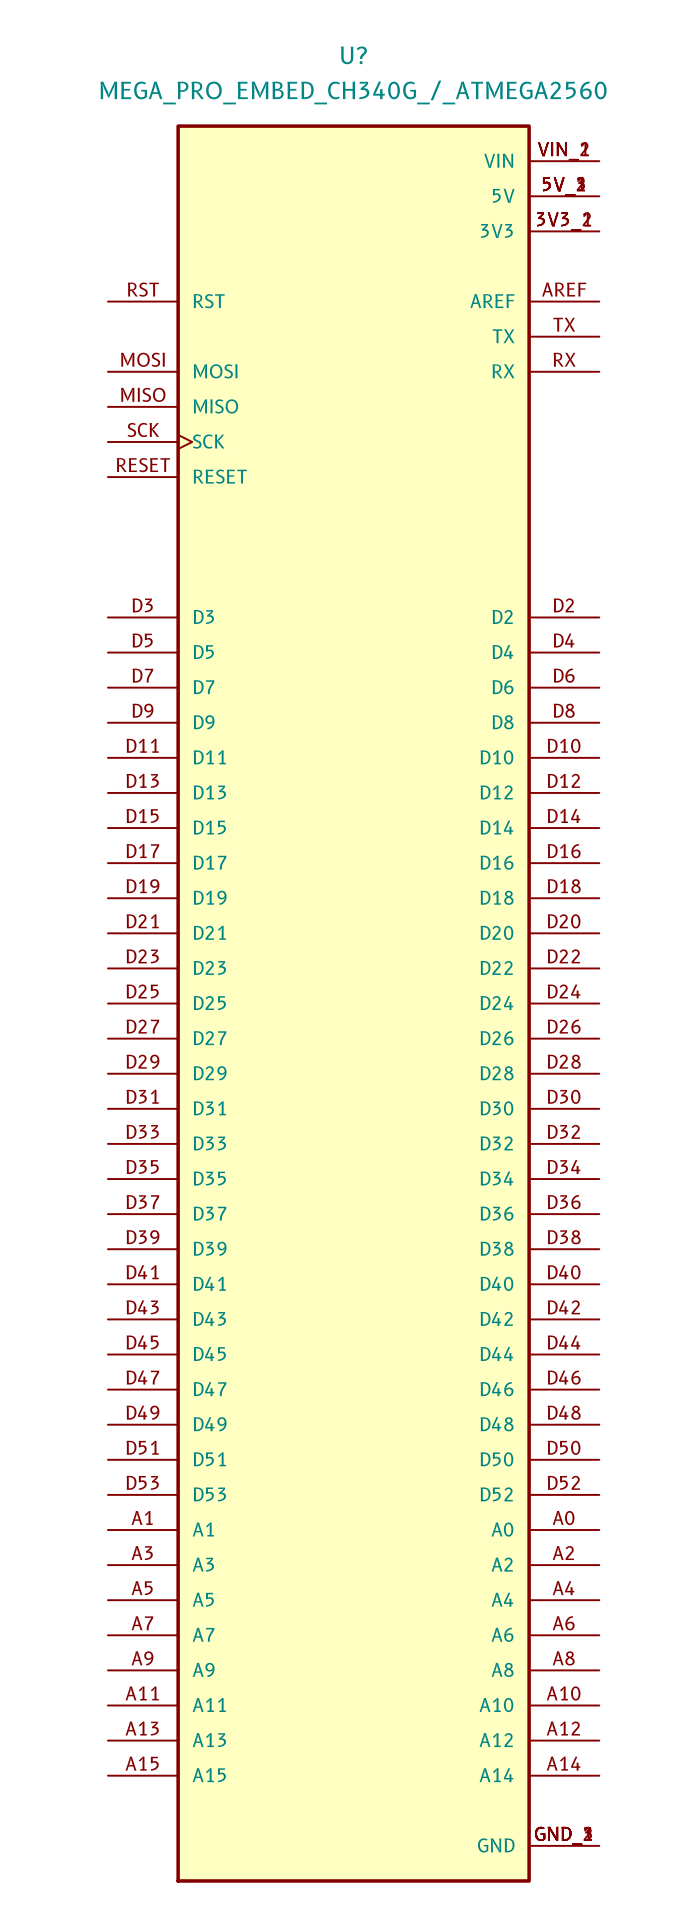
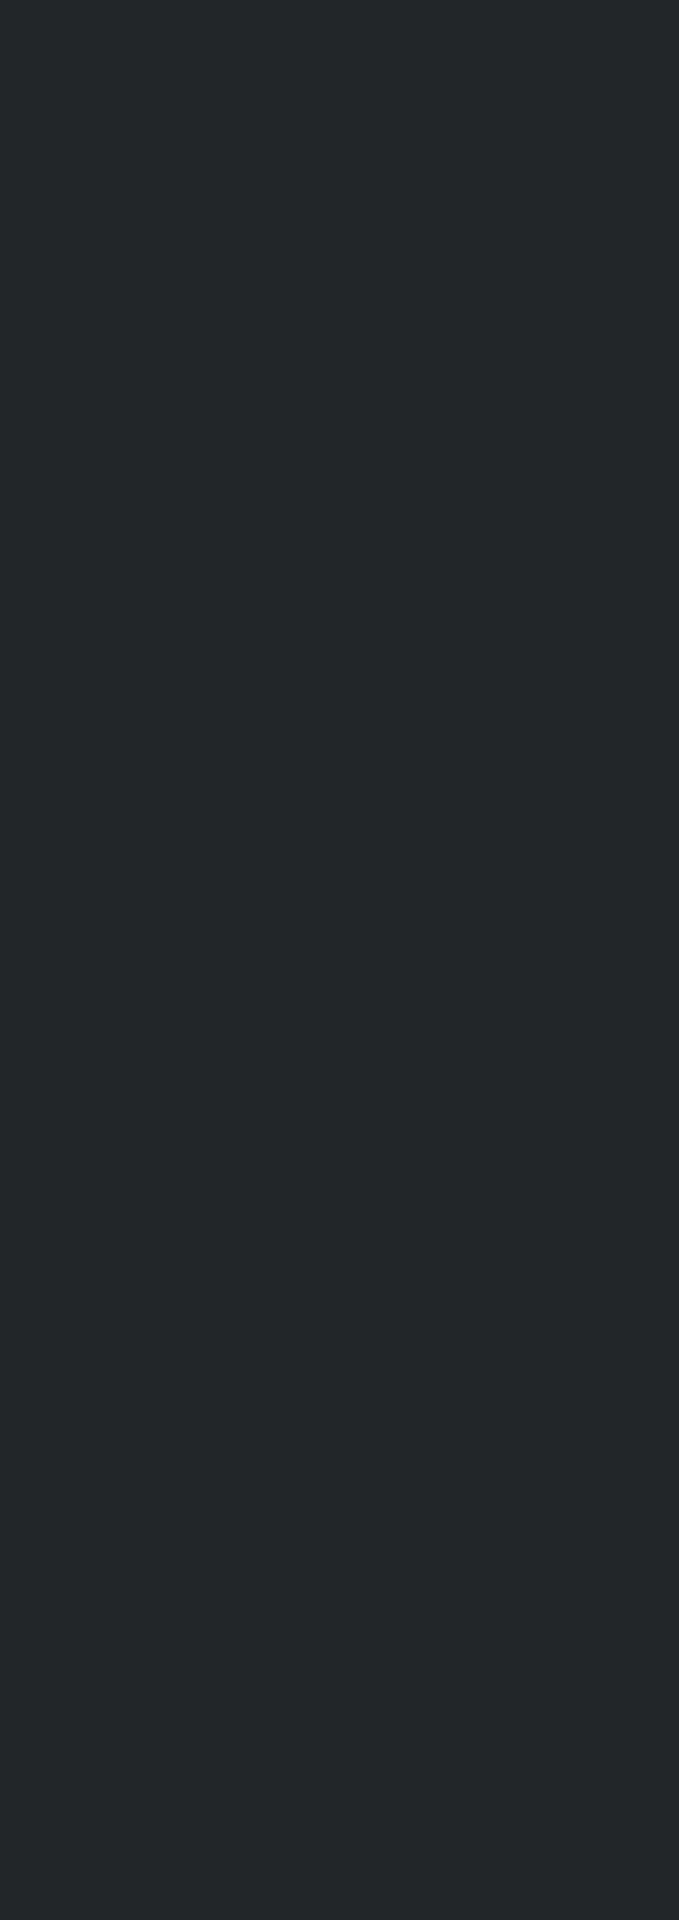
U?: MEGA_PRO_EMBED_CH340G_/_ATMEGA2560 (353, 1003) -> none

